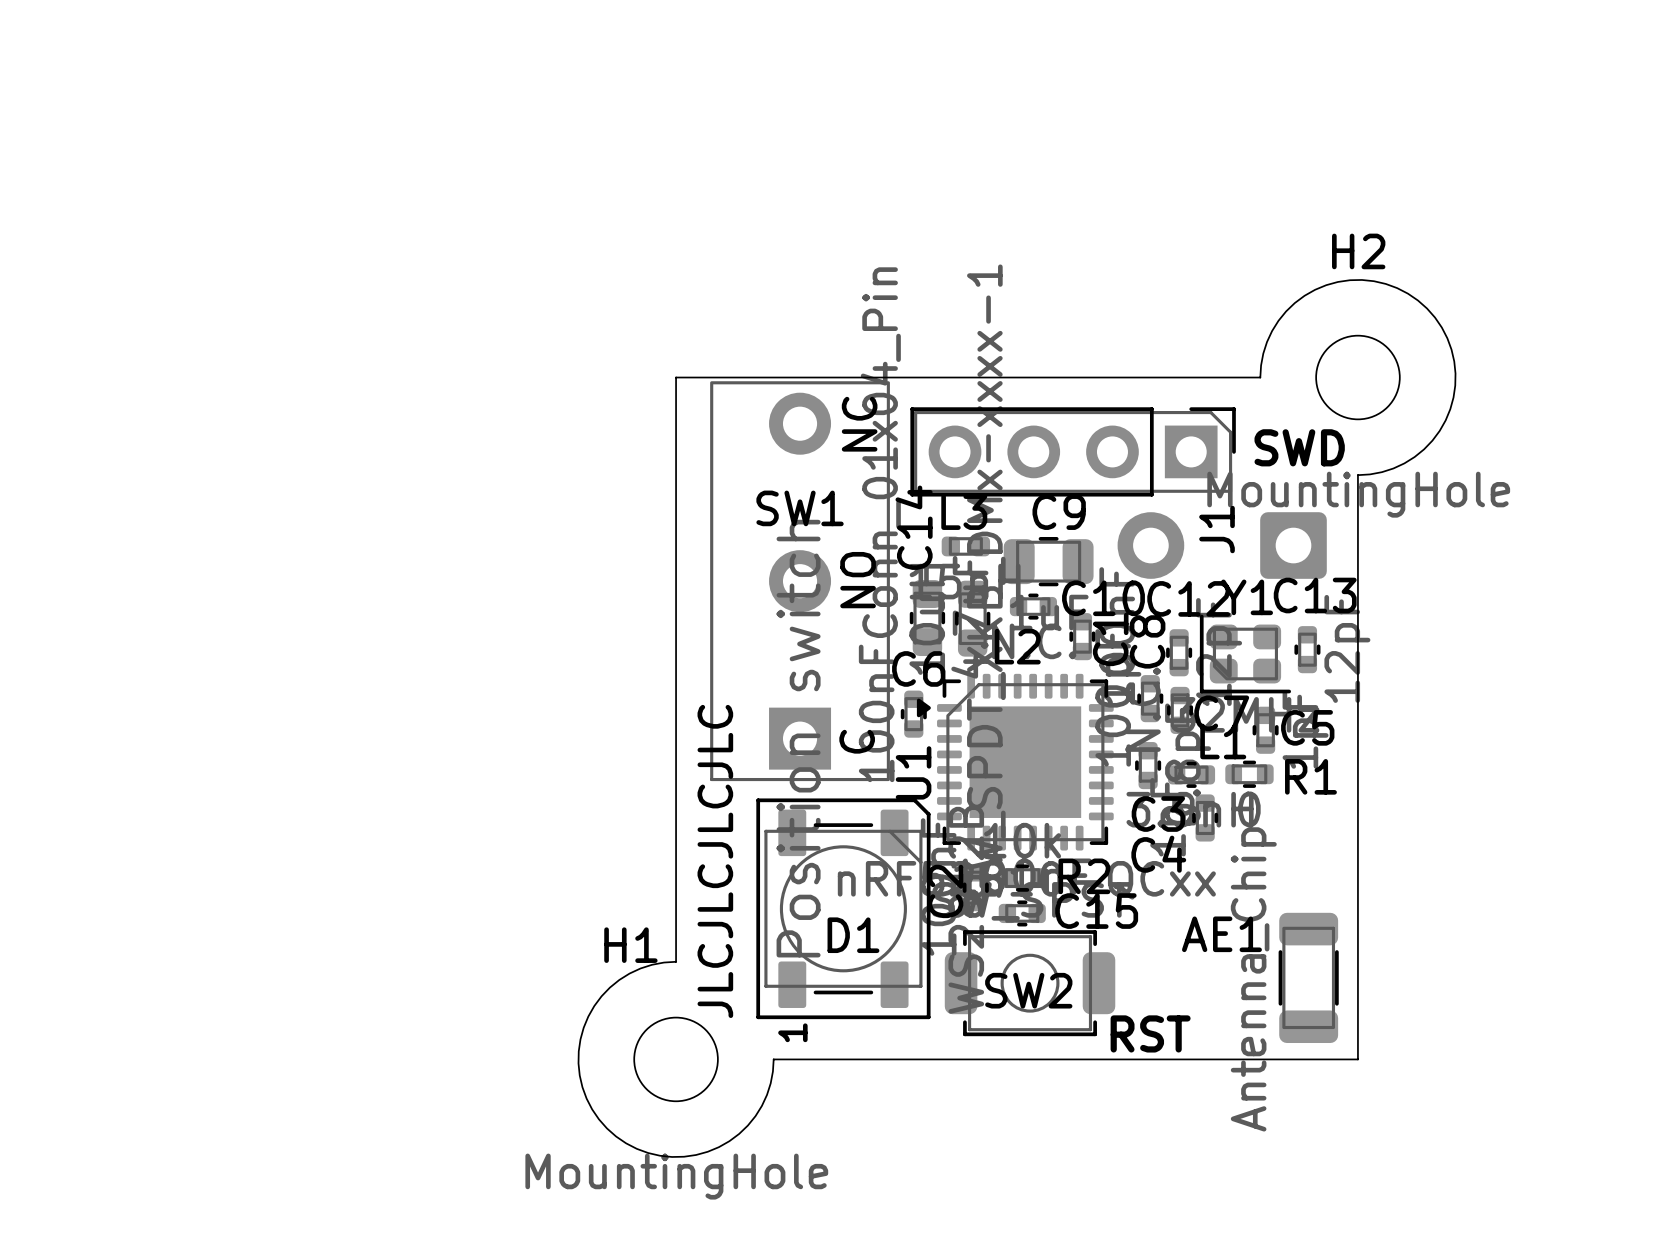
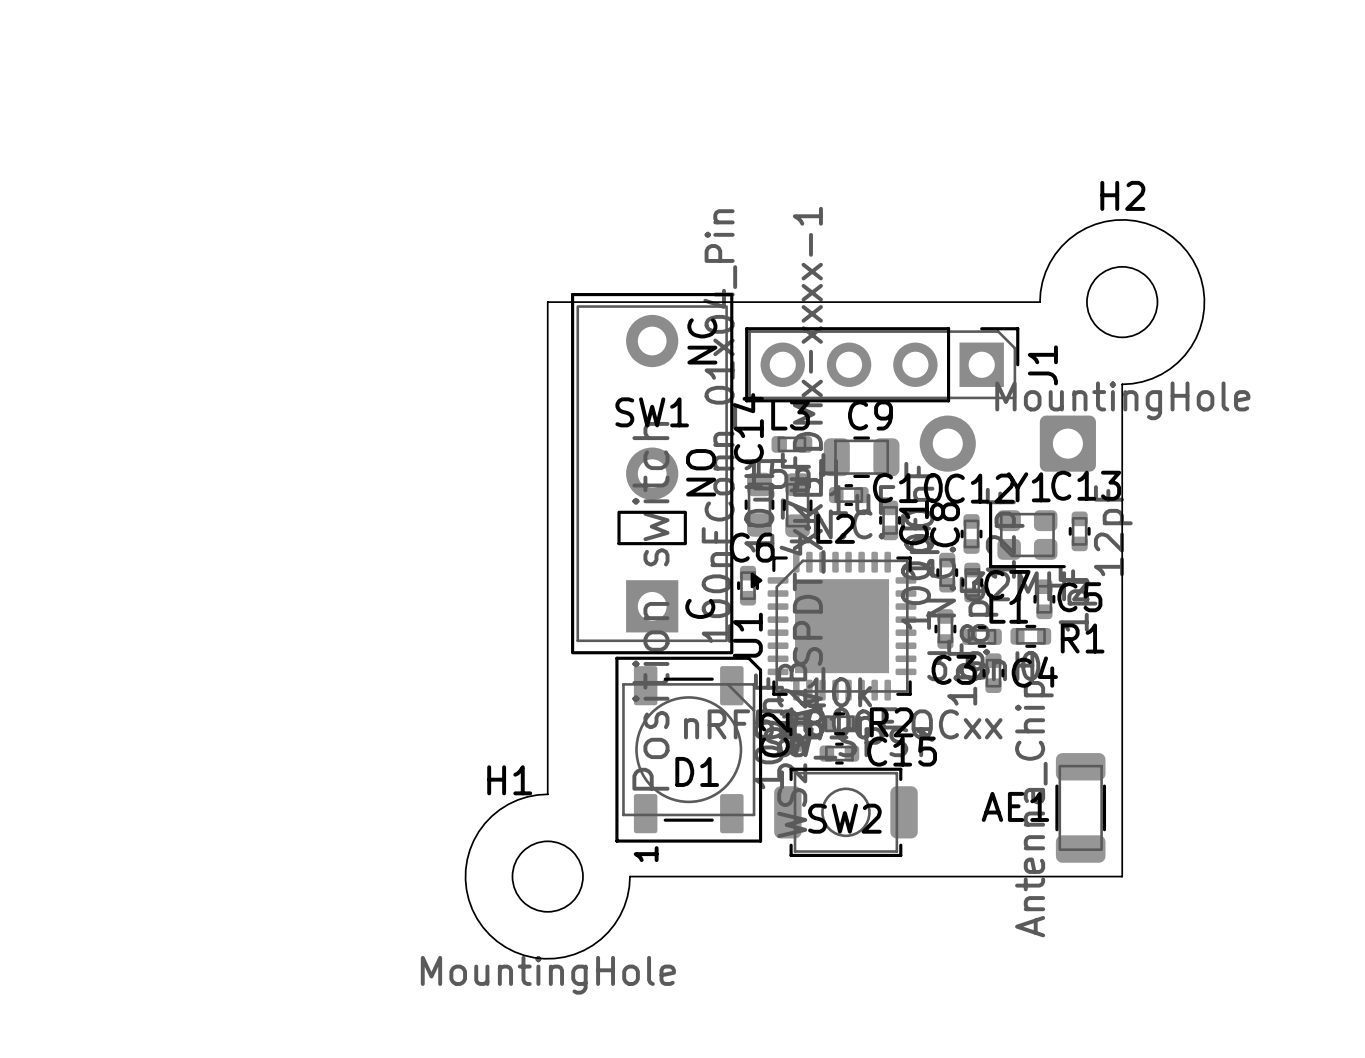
SW1 footprint: [710, 381, 890, 782] -> [571, 293, 734, 655]
text: SWD (1299, 447) -> none
J1 name position: J1 (1217, 529) -> J1 (1042, 365)
C4 name position: C4 (1158, 854) -> C4 (1034, 672)
text: JLCJLCJLCJLC (715, 861) -> none
AE1 name position: AE1 (1221, 934) -> AE1 (1015, 806)
text: RST (1150, 1033) -> none

